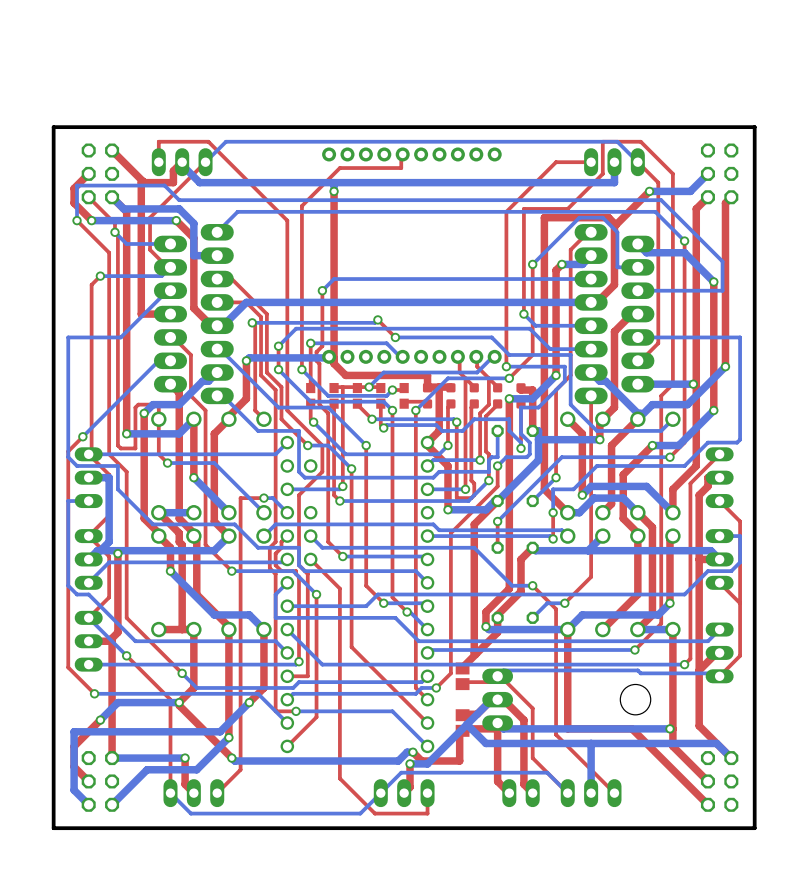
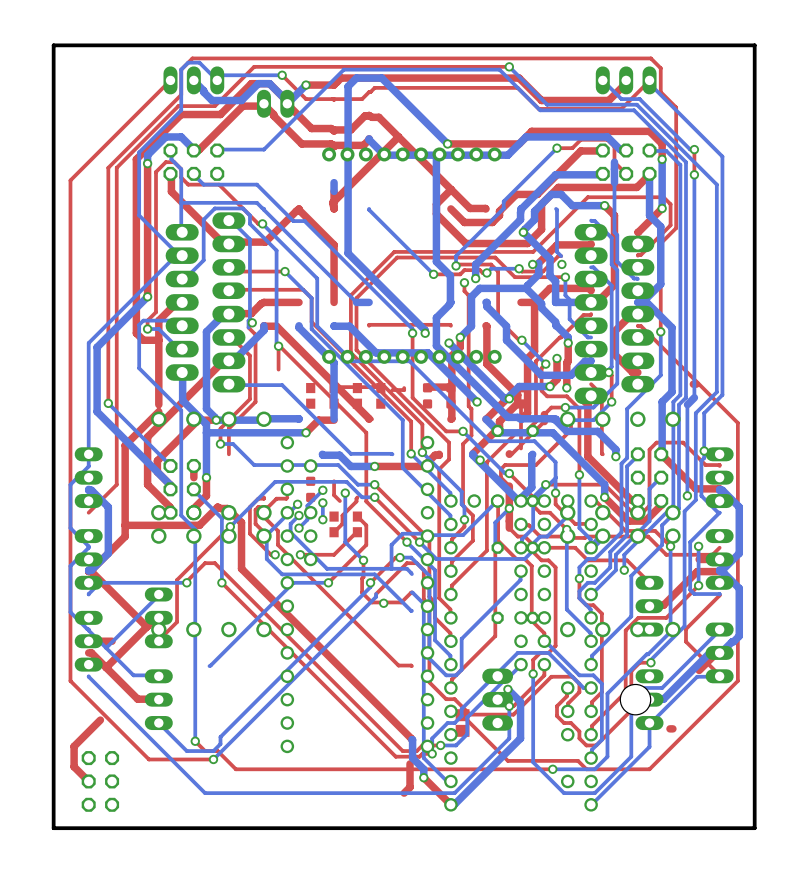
bottom track: none -> (509, 66) (547, 104) (636, 104) (716, 184) (716, 392) (695, 413) (695, 500) (684, 511) (684, 626) (650, 659) (650, 662)
top track: none -> (509, 66) (254, 66) (214, 106) (178, 106) (116, 167) (116, 484) (88, 512)
via: none -> (509, 66)
bottom track: none -> (282, 75) (221, 75) (217, 80) (199, 62) (188, 62) (181, 69) (181, 110) (139, 152) (139, 215) (178, 254) (182, 255) (177, 254) (88, 343) (88, 466) (70, 484) (70, 528) (88, 547) (70, 565) (70, 612) (133, 675) (158, 676)
top track: none -> (282, 75) (306, 99) (362, 99) (374, 87) (517, 87) (538, 108) (621, 108) (649, 80)
via: none -> (282, 75)
top track: none -> (170, 80) (70, 180) (70, 680) (148, 759) (213, 759)
bottom track: none -> (193, 80) (212, 100) (241, 100) (258, 83) (269, 83) (287, 103) (306, 85)
bottom track: none -> (602, 80) (621, 99) (639, 99) (690, 149) (694, 149)
top track: none -> (626, 80) (625, 83) (608, 100) (541, 100) (519, 78) (341, 78) (334, 85) (306, 85)
bottom track: none -> (649, 80) (649, 83) (722, 156) (722, 394) (704, 413) (704, 458) (701, 460) (701, 495) (719, 512) (690, 542) (690, 589) (694, 594) (719, 594)
via: none -> (306, 85)
part: none -> (275, 103)
board edge: (754, 127) (53, 127) -> (754, 127) (754, 45) (53, 45) (53, 127)
bottom track: none -> (369, 138) (384, 155) (507, 155) (526, 136) (607, 136) (620, 149) (626, 150)
top track: none -> (369, 138) (363, 145) (334, 146) (331, 143) (301, 143) (263, 103) (261, 106) (242, 106) (199, 149) (193, 150)
bottom track: none -> (447, 143) (381, 78) (356, 78) (348, 86) (348, 253) (425, 330) (425, 333)
top track: none -> (447, 143) (519, 143) (531, 131) (649, 131) (662, 143) (662, 159)
via: none -> (447, 143)
bottom track: none -> (557, 148) (503, 201) (503, 208) (456, 256) (456, 265)
top track: none -> (557, 148) (572, 148) (580, 139) (607, 139) (614, 146) (614, 162) (626, 173)
via: none -> (557, 148)
top track: none -> (694, 149) (694, 174)
via: none -> (694, 149)
top track: (112, 150) (144, 182) (173, 182) (173, 170) (182, 162) -> none
bottom track: none -> (170, 150) (171, 159) (181, 169) (182, 232)
bottom track: none -> (193, 150) (181, 136) (165, 136) (147, 155) (147, 163)
bottom track: none -> (217, 150) (263, 149) (343, 69) (499, 69) (540, 110) (634, 110) (685, 162) (685, 397) (678, 404) (678, 508) (662, 525) (662, 544) (631, 575) (631, 616) (592, 655) (591, 664)
top track: none -> (602, 150) (580, 150) (537, 194) (516, 194) (499, 211) (499, 215) (492, 222) (464, 222) (450, 208)
bottom track: none -> (649, 150) (666, 150) (680, 165) (680, 394) (673, 401) (673, 505) (624, 554) (624, 570)
top track: (402, 154) (401, 168) (339, 168) (301, 206) (301, 369) -> none
bottom track: none -> (662, 159) (662, 208)
via: none -> (662, 159)
top track: (158, 162) (158, 141) (208, 141) (287, 220) (287, 410) (322, 445) (322, 471) (299, 495) (299, 515) -> none
bottom track: (182, 162) (182, 165) (199, 182) (614, 182) -> (637, 279) (634, 278) (617, 261) (617, 235) (614, 232) (614, 182)
part position: (182, 162) -> (193, 80)
top track: (205, 162) (150, 217) (150, 249) (167, 267) (170, 267) -> none
top track: (591, 162) (556, 162) (506, 211) (506, 366) -> none
part position: (614, 162) -> (626, 80)
bottom track: (637, 162) (617, 141) (225, 141) (205, 162) -> none
top track: (637, 162) (658, 182) (658, 343) (640, 360) (637, 360) -> none
top track: none -> (147, 163) (147, 296)
via: none -> (147, 163)
top track: (88, 173) (74, 188) (74, 203) (91, 220) -> none
part rotation: 0° (100, 173) -> 90° clockwise (193, 162)
part position: (100, 173) -> (193, 162)
top track: none -> (170, 173) (171, 191) (223, 243) (265, 242) (299, 208) (334, 244)
bottom track: none -> (193, 173) (203, 184) (256, 184) (293, 221) (304, 221) (412, 329) (412, 333)
bottom track: none -> (602, 173) (555, 174) (521, 208) (520, 219) (475, 264) (475, 278)
bottom track: none -> (649, 173) (649, 215) (660, 226) (660, 284) (642, 302)
top track: none -> (649, 173) (636, 187) (558, 187) (541, 204) (541, 229) (527, 243) (465, 243) (436, 214) (436, 204) (451, 189)
bottom track: (707, 173) (690, 191) (649, 191) -> none
part rotation: 0° (719, 173) -> 90° clockwise (626, 162)
part position: (719, 173) -> (626, 162)
via: none -> (694, 174)
top track: (142, 181) (141, 314) (170, 314) -> none
via: (334, 191) -> none
top track: (649, 191) (614, 226) -> (604, 205) (614, 215) (614, 226)
via: (649, 191) -> none
top track: (88, 197) (114, 223) (114, 232) (117, 235) (117, 445) (120, 448) (135, 448) (135, 407) (138, 404) (158, 404) -> (182, 302) (177, 302) (158, 320) (158, 404)
bottom track: (112, 197) (123, 208) (179, 208) (193, 223) (193, 255) (217, 255) -> none
top track: (112, 197) (126, 211) (126, 433) -> none
top track: (707, 197) (696, 208) (696, 465) (672, 489) (672, 512) -> none
top track: (731, 197) (725, 203) (725, 366) -> none
bottom track: none -> (604, 205) (572, 205) (561, 194) (551, 194) (534, 211) (534, 219) (524, 229) (523, 232) (549, 258) (549, 275) (555, 281) (555, 302)
via: none -> (604, 205)
top track: (334, 208) (334, 244) -> (334, 208) (332, 202) (398, 136)
bottom track: none -> (369, 208) (433, 274)
top track: none -> (485, 208) (470, 208) (378, 117) (364, 115) (350, 129) (334, 131) (331, 128) (311, 128) (269, 83) (251, 83) (220, 114) (181, 114) (136, 159) (136, 333) (143, 340) (158, 340)
bottom track: none -> (556, 208) (557, 251) (561, 256)
top track: none -> (662, 208) (637, 232)
via: none -> (662, 208)
bottom track: (77, 220) (77, 185) (164, 185) (179, 200) (661, 200) (722, 261) (722, 290) (637, 290) -> none
top track: (77, 220) (109, 252) (109, 454) (126, 471) (126, 617) (182, 673) -> none
via: (77, 220) -> none
via: (91, 220) -> none
bottom track: (176, 220) (91, 220) -> none
top track: (176, 220) (193, 238) (193, 308) (211, 325) (217, 325) -> none
via: (176, 220) -> none
bottom track: none -> (228, 220) (231, 221) (249, 239) (248, 327)
bottom track: none -> (591, 220) (594, 221) (611, 237) (611, 264) (617, 270) (617, 383) (593, 407) (565, 407)
bottom track: none -> (262, 223) (317, 278) (317, 326) (352, 361) (409, 361) (489, 441) (534, 441) (555, 462) (555, 493)
top track: none -> (262, 223) (258, 223) (219, 184) (188, 184) (181, 177) (181, 169) (174, 162) (165, 162) (156, 172) (156, 312) (147, 320) (147, 329)
via: none -> (262, 223)
top track: (615, 224) (608, 217) (544, 217) (544, 414) -> (565, 407) (551, 407) (544, 414)
bottom track: (114, 232) (126, 243) (170, 243) -> none
via: (114, 232) -> none
bottom track: (217, 232) (237, 211) (655, 211) (684, 241) -> none
via: none -> (523, 232)
top track: (591, 232) (588, 232) (570, 249) (570, 375) (556, 390) (556, 477) -> none
top track: (684, 241) (684, 442) (669, 457) -> none
via: (684, 241) -> none
top track: none -> (591, 243) (557, 244) (538, 263)
bottom track: (637, 243) (646, 252) (684, 252) (713, 281) -> none
bottom track: (591, 255) (582, 264) (561, 264) -> none
top track: none -> (637, 255) (641, 254) (670, 225) (670, 204) (663, 197) (587, 197) (533, 251) (394, 251) (350, 295) (350, 352) (422, 424) (422, 452)
top track: none -> (561, 256) (558, 256) (542, 271) (521, 271) (519, 268)
bottom track: none -> (538, 263) (538, 274) (526, 288)
bottom track: (532, 264) (579, 217) (602, 217) (617, 232) (617, 267) (637, 267) -> none
top track: (532, 264) (532, 354) (509, 378) -> none
top track: (561, 264) (556, 270) (556, 375) -> none
top track: none -> (456, 265) (491, 264) (498, 271) (498, 319) (519, 340) (521, 340)
via: none -> (456, 265)
bottom track: (170, 267) (161, 276) (100, 276) -> none
top track: none -> (228, 267) (233, 271) (284, 271)
bottom track: none -> (591, 267) (593, 267) (611, 285) (611, 366) (608, 372)
bottom track: none -> (519, 268) (491, 268) (486, 272)
via: none -> (519, 268)
bottom track: none -> (284, 271) (311, 298) (311, 329) (402, 420) (402, 467) (450, 515) (450, 524)
via: none -> (284, 271)
top track: none -> (486, 272) (482, 272) (479, 270) (464, 270) (460, 274) (433, 274)
via: none -> (486, 272)
via: none -> (433, 274)
top track: (100, 276) (91, 284) (91, 457) -> none
via: (100, 276) -> none
bottom track: none -> (565, 277) (565, 295) (569, 299) (569, 319) (587, 337) (591, 337)
top track: none -> (565, 277) (514, 277) (495, 257) (397, 257) (356, 298) (356, 350) (449, 442) (449, 459) (439, 469) (439, 598) (450, 609) (450, 617)
via: none -> (565, 277)
via: none -> (475, 278)
bottom track: none -> (182, 279) (185, 278) (203, 260) (203, 219) (214, 208) (242, 208) (249, 215) (249, 223) (276, 250) (276, 343)
top track: (217, 279) (231, 279) (266, 314) (266, 372) (281, 387) (281, 419) (307, 445) -> none
bottom track: (591, 279) (334, 279) (322, 290) -> none
top track: (713, 281) (713, 410) -> none
via: (713, 281) -> none
top track: none -> (464, 282) (464, 291) (468, 295) (468, 406) (471, 408) (471, 435) (463, 444) (463, 505) (472, 515) (472, 540) (451, 561) (450, 571)
via: none -> (464, 282)
bottom track: none -> (526, 288) (479, 288) (471, 296) (471, 326) (460, 337)
bottom track: none -> (526, 288) (541, 303) (541, 308) (568, 337) (568, 343)
bottom track: (170, 290) (167, 290) (120, 337) (68, 337) (68, 457) (77, 465) (117, 465) (117, 489) (152, 524) (234, 524) (258, 547) (299, 547) (299, 565) (304, 571) (415, 571) (427, 582) -> none
top track: none -> (228, 290) (303, 289) (311, 298) (311, 322) (411, 421) (411, 453)
top track: (322, 290) (322, 346) (316, 352) (316, 360) (319, 363) (319, 404) (328, 413) (328, 541) (342, 556) -> none
via: (322, 290) -> none
top track: none -> (591, 290) (589, 288) (549, 288) (535, 302) (521, 302)
bottom track: none -> (147, 296) (97, 347) (97, 411) (170, 484) (170, 489)
via: none -> (147, 296)
top track: (217, 302) (246, 302) (261, 317) (261, 375) (275, 390) (275, 541) (269, 547) (269, 568) (275, 574) (275, 711) (296, 711) -> none
top track: none -> (299, 302) (263, 302) (251, 313) (228, 314)
top track: (334, 302) (334, 357) (329, 356) (345, 375) (427, 375) (427, 387) -> none
bottom track: (356, 302) (246, 302) (223, 325) (217, 325) -> (356, 302) (256, 202) (181, 202)
bottom track: (450, 302) (369, 302) -> (450, 302) (450, 275) (436, 261) (436, 155)
bottom track: (485, 302) (450, 302) -> (615, 456) (615, 449) (597, 431) (566, 431) (556, 419) (507, 417) (436, 345) (436, 317) (450, 302)
top track: none -> (534, 302) (534, 351) (527, 358) (527, 413) (521, 419)
bottom track: (555, 302) (486, 302) -> (591, 360) (585, 361) (571, 375) (541, 375) (506, 340) (506, 326) (486, 306) (486, 302)
bottom track: none -> (637, 302) (646, 302) (671, 327) (671, 392) (662, 401) (661, 454)
part position: (193, 314) -> (205, 302)
bottom track: none -> (228, 314) (223, 315) (206, 331) (206, 408) (216, 420) (299, 419)
bottom track: (523, 314) (535, 325) (591, 325) -> none
top track: (523, 314) (523, 208) (567, 208) (602, 173) (602, 141) (640, 141) (672, 173) (672, 384) (661, 395) (661, 623) (634, 650) -> none
via: (523, 314) -> none
top track: none -> (591, 314) (583, 315) (535, 361) (535, 421) (526, 431) (517, 431) (486, 462) (486, 550) (451, 585) (450, 594)
bottom track: (377, 319) (374, 322) (252, 322) -> none
top track: (377, 319) (395, 337) -> none
via: (377, 319) -> none
top track: (252, 322) (255, 325) (255, 410) (263, 419) -> none
bottom track: none -> (182, 325) (177, 320) (143, 320) (139, 324) (139, 368) (181, 410) (181, 515) (195, 529) (195, 741)
bottom track: none -> (263, 325) (263, 330) (234, 359) (228, 360)
top track: none -> (263, 325) (276, 326) (369, 419)
bottom track: none -> (299, 325) (334, 362) (334, 419)
bottom track: none -> (334, 325) (349, 326) (376, 352) (428, 352) (477, 401)
top track: none -> (450, 325) (369, 325)
top track: none -> (485, 325) (486, 364) (517, 394) (517, 403) (499, 421) (499, 427) (472, 453)
top track: none -> (637, 325) (641, 326) (737, 422) (737, 680) (649, 769) (586, 769) (578, 760) (507, 760) (458, 711) (450, 711)
top track: none -> (248, 327) (255, 334) (255, 401) (228, 428) (228, 454)
bottom track: none -> (147, 329) (158, 329) (178, 348) (182, 349)
via: none -> (147, 329)
bottom track: none -> (660, 331) (660, 375) (627, 408) (627, 458) (621, 463) (621, 532) (594, 558) (587, 558) (579, 567) (579, 578)
top track: none -> (660, 331) (660, 243) (676, 228) (676, 107) (660, 92) (660, 68) (650, 58) (192, 58) (181, 69) (181, 94) (108, 167) (108, 403)
via: none -> (660, 331)
top track: none -> (412, 333) (412, 397) (446, 431) (463, 431)
via: none -> (412, 333)
via: none -> (425, 333)
top track: (170, 337) (173, 337) (190, 354) (190, 395) (205, 410) (205, 544) (231, 571) -> none
top track: none -> (228, 337) (231, 337) (249, 355) (249, 399) (220, 428) (220, 444)
bottom track: (395, 337) (491, 337) (509, 354) (570, 354) (570, 404) (596, 430) (661, 430) (672, 419) -> none
via: (395, 337) -> none
top track: none -> (460, 337) (460, 347) (451, 355) (450, 419)
via: none -> (460, 337)
bottom track: (637, 337) (740, 337) (740, 439) (737, 442) (707, 442) (684, 465) (596, 465) (573, 489) (553, 489) (553, 512) -> none
bottom track: none -> (521, 340) (545, 364)
via: none -> (521, 340)
top track: none -> (276, 343) (366, 432) (366, 501) (406, 542)
bottom track: (310, 343) (386, 343) (402, 356) -> none
top track: (310, 343) (310, 388) -> none
via: (310, 343) -> none
bottom track: none -> (449, 343) (506, 399) (519, 386) (549, 386)
via: none -> (449, 343)
top track: none -> (568, 343) (566, 387)
via: none -> (568, 343)
bottom track: (278, 346) (296, 328) (529, 328) (550, 349) (591, 349) -> none
bottom track: (217, 349) (220, 349) (278, 407) (328, 407) (366, 445) -> none
top track: (614, 354) (614, 407) (599, 425) (599, 439) -> (614, 354) (632, 372) (637, 372)
bottom track: (329, 356) (249, 357) (246, 360) -> none
top track: (457, 356) (459, 357) (459, 372) (474, 387) -> none
top track: (476, 356) (477, 366) (497, 387) -> none
bottom track: (494, 356) (477, 372) (383, 372) (369, 387) -> none
top track: none -> (557, 358) (557, 379) (549, 386)
via: none -> (557, 358)
bottom track: (170, 360) (158, 360) (82, 436) -> none
top track: none -> (228, 360) (223, 361) (147, 437) (147, 484) (170, 507) (170, 512)
top track: (246, 360) (246, 398) (214, 433) (214, 521) (228, 536) -> none
via: (246, 360) -> none
top track: none -> (545, 364) (541, 368) (541, 390) (547, 396) (566, 396) (579, 408) (579, 474)
via: none -> (545, 364)
bottom track: (506, 366) (564, 366) (564, 381) (538, 407) (521, 407) (521, 433) (529, 442) (529, 454) (526, 457) (506, 457) (497, 465) -> none
via: (506, 366) -> none
bottom track: (725, 366) (694, 397) -> (694, 174) (694, 397)
via: (725, 366) -> none
bottom track: (278, 369) (310, 401) (383, 401) (392, 410) -> none
via: (278, 369) -> none
bottom track: (301, 369) (328, 395) (386, 395) (392, 390) -> none
via: (301, 369) -> none
bottom track: none -> (182, 372) (182, 400) (206, 424) (206, 477)
bottom track: (217, 372) (208, 381) (202, 381) (179, 404) (152, 404) (144, 413) -> none
bottom track: (591, 372) (599, 381) (605, 381) (637, 413) (640, 413) (637, 419) (652, 404) (687, 404) -> (687, 495) (687, 404)
top track: none -> (608, 372) (611, 375) (611, 401)
via: none -> (608, 372)
bottom track: (556, 375) (532, 398) (509, 398) -> none
via: (556, 375) -> none
top track: (465, 378) (465, 489) -> none
top track: (488, 378) (488, 404) (480, 413) (480, 460) -> none
bottom track: (509, 378) (447, 378) (415, 410) -> none
via: (509, 378) -> none
top track: (170, 384) (179, 392) (179, 518) (193, 533) (196, 539) (196, 594) (228, 626) (228, 737) -> none
bottom track: none -> (228, 384) (282, 385) (350, 453) (392, 454)
top track: none -> (591, 384) (601, 394) (602, 454)
bottom track: (693, 384) (637, 384) -> none
via: (693, 384) -> none
via: none -> (549, 386)
top track: (342, 387) (342, 486) -> none
via: (369, 387) -> none
top track: (439, 387) (439, 430) (427, 442) (427, 445) (447, 465) (447, 509) -> none
top track: (521, 387) (521, 390) (532, 390) (532, 430) -> none
via: none -> (566, 387)
via: (392, 390) -> none
bottom track: (217, 395) (223, 395) (258, 430) (299, 430) (299, 471) (304, 477) (433, 477) (439, 471) (488, 471) (488, 460) (491, 457) (497, 457) (497, 430) -> none
part: (404, 395) -> none
part: (474, 395) -> none
part: (497, 395) -> none
top track: (591, 395) (591, 576) (564, 603) -> none
top track: (509, 398) (509, 453) -> none
top track: none -> (506, 399) (485, 419)
top track: none -> (582, 399) (587, 404) (587, 456) (631, 500) (637, 501)
via: none -> (477, 401)
bottom track: none -> (611, 401) (593, 420) (571, 420)
via: none -> (611, 401)
bottom track: none -> (108, 403) (170, 465)
via: none -> (108, 403)
top track: (310, 403) (310, 419) (313, 422) -> none
top track: (380, 403) (380, 425) (383, 428) -> none
top track: (404, 403) (404, 401) (427, 401) (427, 403) -> none
top track: (450, 403) (447, 407) (447, 445) -> none
top track: (474, 403) (471, 407) (471, 480) (474, 483) (474, 495) (471, 498) (456, 498) (456, 422) -> none
top track: (497, 403) (485, 416) (485, 451) (488, 454) (488, 480) -> none
via: none -> (565, 407)
top track: (392, 410) (392, 597) (407, 612) -> none
via: (392, 410) -> none
top track: (415, 410) (415, 687) (427, 699) -> none
via: (415, 410) -> none
bottom track: (713, 410) (678, 445) (652, 445) -> none
via: (713, 410) -> none
top track: (158, 411) (158, 454) (167, 463) -> (158, 411) (125, 445) (125, 536) (88, 571) (91, 571) (146, 626)
top track: (144, 413) (144, 518) (170, 547) (170, 571) -> none
via: (144, 413) -> none
bottom track: (193, 419) (179, 433) (126, 433) -> none
top track: (193, 419) (193, 465) -> none
bottom track: (372, 419) (453, 419) (456, 422) -> none
via: (372, 419) -> none
bottom track: none -> (485, 419) (499, 432) (552, 432) (604, 484) (604, 497)
top track: (567, 419) (582, 433) (582, 495) -> none
top track: (637, 419) (611, 445) (611, 503) (602, 512) -> none
top track: none -> (216, 420) (198, 420) (157, 460) (157, 472) (170, 484) (170, 489)
via: none -> (216, 420)
top track: (334, 420) (334, 481) -> (334, 420) (318, 420) (306, 432)
top track: (544, 421) (544, 489) (567, 512) -> (544, 421) (512, 453) (509, 454)
bottom track: (313, 422) (345, 454) (439, 454) (447, 445) -> none
via: (313, 422) -> none
via: (456, 422) -> none
bottom track: (383, 428) (386, 425) (436, 425) (442, 430) (462, 430) (474, 419) (509, 419) (509, 430) (521, 442) (521, 448) -> none
via: (383, 428) -> none
bottom track: (532, 430) (538, 430) (538, 460) (497, 501) (494, 501) (485, 509) (447, 509) -> none
bottom track: none -> (463, 431) (505, 473) (509, 473)
via: none -> (463, 431)
bottom track: none -> (306, 432) (206, 432)
via: none -> (306, 432)
via: (126, 433) -> none
top track: (82, 436) (68, 451) (68, 667) (94, 693) -> none
via: (82, 436) -> none
bottom track: (599, 439) (538, 439) -> none
via: (599, 439) -> none
bottom track: (287, 442) (275, 454) (88, 454) -> none
bottom track: none -> (220, 444) (233, 444) (254, 465) (338, 465) (357, 484) (374, 484)
via: none -> (220, 444)
bottom track: (307, 445) (328, 445) (351, 468) -> none
via: (307, 445) -> none
top track: (366, 445) (366, 585) (383, 603) -> none
via: (366, 445) -> none
via: (447, 445) -> none
top track: (652, 445) (623, 474) (623, 518) (637, 533) (637, 594) (602, 629) -> none
via: (652, 445) -> none
via: (521, 448) -> none
via: none -> (704, 451)
bottom track: none -> (422, 452) (461, 491) (464, 519)
via: none -> (422, 452)
bottom track: none -> (411, 453) (450, 493) (450, 501)
via: none -> (411, 453)
bottom track: none -> (472, 453) (517, 500) (521, 501) (521, 497) (531, 487) (532, 454)
top track: (88, 454) (109, 474) (109, 515) (88, 536) (109, 556) (109, 597) (88, 617) -> none
bottom track: none -> (322, 454) (339, 455) (350, 466) (374, 466)
top track: none -> (439, 454) (435, 455) (423, 466) (374, 466)
top track: (509, 454) (509, 486) -> (571, 420) (571, 429) (535, 465) (505, 465) (500, 469) (500, 477) (509, 486)
bottom track: none -> (637, 454) (627, 466) (627, 535) (610, 551) (610, 567) (594, 582) (587, 582) (579, 591) (579, 598) (590, 609) (591, 617)
top track: none -> (661, 454) (695, 488) (719, 489)
top track: (719, 454) (690, 483) (690, 658) (684, 664) -> none
via: none -> (615, 456)
bottom track: (669, 457) (561, 457) (497, 521) -> none
via: (669, 457) -> none
bottom track: (480, 460) (433, 460) (427, 465) -> none
bottom track: (167, 463) (214, 463) (263, 512) -> none
via: (167, 463) -> none
top track: (497, 465) (497, 486) (450, 533) (450, 673) (436, 687) -> none
via: (497, 465) -> none
top track: none -> (719, 465) (705, 465) (683, 442) (656, 442) (649, 449) (649, 505) (642, 512) (632, 512) (604, 484) (545, 484)
via: none -> (374, 466)
top track: (351, 468) (351, 647) (427, 723) -> none
via: (351, 468) -> none
top track: none -> (509, 473) (531, 495) (531, 504) (540, 512) (549, 512) (566, 529)
via: none -> (509, 473)
bottom track: none -> (579, 474) (579, 528) (590, 539) (591, 547)
via: none -> (579, 474)
bottom track: (88, 477) (109, 477) (109, 541) (100, 550) -> none
bottom track: (193, 477) (228, 512) -> none
via position: (193, 477) -> (206, 477)
top track: none -> (206, 477) (206, 495) (193, 508) (193, 512)
via: (556, 477) -> none
part: none -> (649, 477)
bottom track: none -> (661, 477) (649, 488) (649, 521) (615, 554) (615, 570) (591, 594)
top track: (719, 477) (707, 477) (707, 486) (699, 495) (699, 725) (731, 758) -> none
bottom track: (488, 480) (468, 501) (339, 501) -> none
via: (488, 480) -> none
top track: none -> (374, 484) (429, 539) (429, 596) (435, 602) (435, 617) (450, 633) (450, 641)
via: none -> (374, 484)
bottom track: none -> (545, 484) (533, 497) (533, 528) (521, 539) (521, 547)
via: none -> (545, 484)
bottom track: (342, 486) (339, 489) (287, 489) -> none
via: (342, 486) -> none
bottom track: none -> (88, 489) (108, 507) (108, 553) (88, 571)
part: none -> (182, 489)
bottom track: none -> (193, 489) (221, 518) (221, 582)
part: none -> (310, 489)
bottom track: (465, 489) (427, 489) -> none
via: (465, 489) -> none
bottom track: none -> (719, 489) (739, 507) (739, 553) (722, 570) (719, 570) (739, 588) (739, 636) (722, 651) (709, 652) (663, 699) (649, 699)
bottom track: none -> (322, 490) (307, 505) (307, 519) (299, 528)
via: none -> (322, 490)
bottom track: none -> (345, 493) (345, 542) (363, 560)
via: none -> (345, 493)
top track: none -> (555, 493) (555, 504) (575, 523) (591, 524)
via: none -> (555, 493)
bottom track: (582, 495) (591, 486) (646, 486) (672, 512) -> none
via: (582, 495) -> none
via: none -> (687, 495)
top track: none -> (263, 497) (258, 498) (249, 507) (249, 533) (270, 554) (275, 554)
top track: none -> (287, 497) (276, 498) (268, 507) (258, 507) (255, 509) (255, 523) (263, 532)
top track: none -> (357, 497) (356, 501) (342, 515) (342, 523) (334, 532)
bottom track: none -> (374, 497) (362, 497) (346, 481) (275, 481) (230, 526)
top track: none -> (374, 497) (419, 542)
via: none -> (374, 497)
top track: none -> (604, 497) (628, 521) (645, 521) (660, 505) (661, 501)
via: none -> (604, 497)
bottom track: (263, 498) (272, 498) (287, 512) -> none
top track: (263, 498) (240, 498) (240, 769) (217, 793) -> none
via: (263, 498) -> none
bottom track: (88, 501) (68, 501) (68, 585) (77, 594) (88, 594) (135, 641) (275, 641) (287, 652) -> none
via: (339, 501) -> none
bottom track: none -> (497, 501) (463, 535) (402, 533) (391, 544) (391, 568)
top track: (497, 501) (474, 524) (475, 654) -> (497, 501) (498, 540) (516, 558) (524, 558) (531, 565) (531, 620) (544, 633) (544, 641)
bottom track: none -> (567, 501) (566, 516) (547, 536) (540, 536) (531, 544) (531, 551) (524, 558) (436, 558) (419, 542)
top track: none -> (591, 501) (596, 501) (625, 530) (655, 530) (670, 546)
top track: (719, 501) (740, 521) (740, 655) (719, 676) -> (719, 594) (685, 629) (685, 641) (719, 676)
bottom track: none -> (322, 502) (322, 519)
via: none -> (322, 502)
bottom track: none -> (297, 504) (266, 535) (266, 558) (282, 574) (374, 574) (411, 610)
via: none -> (297, 504)
bottom track: none -> (509, 508) (495, 522) (495, 550)
via: none -> (509, 508)
via: (447, 509) -> none
top track: (158, 512) (179, 533) (179, 541) (182, 544) (182, 629) -> none
bottom track: (193, 512) (158, 512) -> none
top track: (553, 512) (553, 539) -> none
via: (553, 512) -> none
bottom track: (637, 512) (623, 498) (594, 498) (579, 512) (567, 512) -> none
top track: (637, 512) (652, 527) (652, 614) (637, 629) -> none
bottom track: none -> (299, 515) (290, 523) (290, 532) (327, 568) (406, 568) (411, 574)
via: none -> (299, 515)
top track: none -> (263, 516) (277, 530) (277, 544) (398, 665) (411, 666)
top track: (299, 516) (299, 565) (307, 574) (307, 676) (287, 676) -> none
top track: none -> (357, 516) (366, 525) (366, 544) (328, 582)
via: none -> (322, 519)
top track: none -> (464, 519) (464, 526) (451, 539) (450, 547)
via: none -> (464, 519)
via: (497, 521) -> none
part: none -> (334, 524)
part: none -> (357, 524)
top track: none -> (521, 524) (528, 525) (540, 536) (648, 536) (666, 554) (712, 554) (719, 547)
top track: none -> (125, 525) (199, 525) (217, 507) (227, 508) (241, 522) (241, 568) (411, 739)
top track: none -> (230, 526) (177, 580) (177, 622) (158, 641)
via: none -> (230, 526)
via: none -> (299, 528)
top track: (509, 528) (509, 588) (485, 612) (485, 626) -> (509, 528) (517, 536) (524, 536) (533, 544) (533, 551) (541, 560) (548, 560) (555, 567) (555, 645) (548, 652) (540, 652) (533, 659) (533, 673)
bottom track: none -> (566, 529) (566, 609) (590, 633) (591, 641)
via: none -> (566, 529)
top track: none -> (357, 532) (334, 554) (300, 554)
bottom track: (228, 536) (214, 550) (97, 550) (88, 559) -> none
top track: (287, 536) (281, 541) (281, 547) (275, 553) (275, 565) (281, 571) (296, 571) (299, 576) (299, 661) -> none
bottom track: (310, 536) (322, 547) (474, 547) (512, 585) (532, 585) -> none
bottom track: (427, 536) (550, 536) (553, 539) -> none
bottom track: (567, 536) (561, 530) (439, 530) (433, 524) (275, 524) (263, 536) -> none
top track: (672, 536) (669, 539) (669, 603) -> none
bottom track: (719, 536) (740, 536) (740, 562) (731, 571) (707, 571) (684, 594) (377, 594) (366, 606) (287, 606) -> none
via: (553, 539) -> none
bottom track: none -> (406, 542) (435, 570) (435, 640) (450, 655) (450, 664)
via: none -> (406, 542)
via: none -> (419, 542)
bottom track: none -> (670, 546) (670, 631) (607, 693) (607, 756) (594, 769) (552, 769)
via: none -> (670, 546)
bottom track: none -> (698, 546) (698, 585)
via: none -> (698, 546)
bottom track: (532, 547) (535, 550) (710, 550) (719, 559) -> none
top track: (532, 547) (521, 559) (521, 591) (497, 614) (497, 632) (462, 668) -> none
top track: none -> (544, 547) (575, 547) (587, 560) (627, 560) (649, 582)
top track: none -> (495, 550) (495, 636) (451, 679) (450, 687)
top track: (117, 553) (117, 632) (112, 638) (112, 758) -> none
via: (117, 553) -> none
via: none -> (275, 554)
via: none -> (300, 554)
bottom track: (342, 556) (424, 556) (427, 559) -> none
via: (342, 556) -> none
bottom track: none -> (399, 557) (411, 557) (429, 575) (429, 658) (446, 675) (456, 675) (461, 669) (461, 638) (520, 580) (521, 571)
top track: none -> (399, 557) (395, 557) (370, 582)
via: none -> (399, 557)
bottom track: (287, 559) (284, 562) (109, 562) (88, 582) -> none
top track: (310, 559) (339, 588) (339, 778) (374, 813) (427, 813) (427, 793) -> none
top track: none -> (363, 560) (362, 592) (371, 602) (401, 602) (411, 592)
via: none -> (363, 560)
via: none -> (624, 570)
bottom track: (170, 571) (214, 614) (249, 614) (263, 629) -> none
via position: (170, 571) -> (186, 582)
bottom track: (231, 571) (293, 571) (316, 594) -> none
via position: (231, 571) -> (221, 582)
top track: none -> (719, 571) (697, 571) (663, 605) (649, 606)
top track: none -> (579, 578) (579, 598) (586, 605) (593, 605) (601, 613) (601, 692) (592, 701) (591, 711)
via: none -> (579, 578)
bottom track: none -> (186, 582) (99, 582) (88, 594)
top track: none -> (186, 582) (205, 563) (214, 563) (402, 751) (416, 751) (422, 745) (440, 745)
top track: none -> (221, 582) (395, 756) (419, 756) (422, 753) (432, 753)
bottom track: (287, 582) (275, 594) (275, 617) (395, 617) (418, 641) (707, 641) (719, 629) -> (533, 673) (533, 762) (564, 793) (594, 793) (631, 756) (631, 694) (638, 687) (662, 687) (719, 629)
bottom track: none -> (328, 582) (293, 582) (209, 666)
via: none -> (328, 582)
bottom track: none -> (370, 582) (370, 587) (220, 737) (220, 744) (213, 751) (186, 751) (158, 723)
via: none -> (370, 582)
top track: (719, 582) (740, 603) -> none
top track: (532, 585) (556, 609) (556, 734) (614, 793) -> none
via: (532, 585) -> none
top track: none -> (698, 585) (666, 617) (638, 617) (625, 630) (625, 692) (592, 725) (591, 734)
via: none -> (698, 585)
bottom track: none -> (411, 592) (423, 603) (423, 758) (446, 780) (450, 781)
bottom track: none -> (158, 594) (106, 648)
top track: (316, 594) (316, 717) (287, 746) -> none
via: (316, 594) -> none
bottom track: none -> (376, 594) (376, 596) (213, 759)
top track: none -> (376, 594) (406, 563) (416, 563) (423, 570) (423, 599) (429, 605) (429, 682) (446, 699) (454, 699) (470, 714) (513, 714) (551, 676) (572, 676) (579, 683) (579, 692) (568, 703) (567, 711)
bottom track: (383, 603) (424, 603) (427, 606) -> none
bottom track: (564, 603) (547, 603) (532, 617) -> none
via: (564, 603) -> none
bottom track: (669, 603) (658, 614) (582, 614) (567, 629) (488, 629) (485, 626) -> none
via: (669, 603) -> none
part: none -> (649, 606)
bottom track: (407, 612) (410, 612) (427, 629) -> none
via: (407, 612) -> none
bottom track: (88, 617) (126, 655) -> none
top track: none -> (158, 617) (156, 617) (106, 667)
part: none -> (158, 617)
via: (485, 626) -> none
top track: (158, 629) (193, 629) (193, 687) (179, 702) (179, 705) (231, 758) -> none
top track: (263, 629) (263, 687) (249, 702) -> none
bottom track: (287, 629) (322, 664) (684, 664) -> none
top track: (567, 629) (567, 728) (632, 728) (707, 804) -> none
bottom track: (672, 629) (637, 629) -> none
top track: (672, 629) (672, 746) (707, 781) -> none
bottom track: none -> (544, 641) (579, 675) (593, 675) (601, 683) (601, 739) (592, 749) (591, 758)
bottom track: (634, 650) (430, 650) (427, 652) -> none
via: (634, 650) -> none
top track: none -> (88, 652) (91, 652) (137, 699) (158, 699)
part: none -> (521, 652)
top track: (126, 655) (170, 699) (170, 793) -> none
via: (126, 655) -> none
bottom track: (299, 661) (296, 664) (88, 664) -> none
via: (299, 661) -> none
top track: none -> (650, 662) (639, 662) (631, 671) (631, 710) (596, 745) (586, 745) (579, 738) (579, 731) (571, 723) (564, 723) (557, 716) (557, 706) (566, 696) (567, 687)
via: none -> (650, 662)
bottom track: none -> (521, 664) (467, 717) (467, 734) (456, 745) (440, 745)
top track: none -> (544, 664) (544, 675) (513, 706) (509, 706)
via: (684, 664) -> none
bottom track: (182, 673) (196, 687) (293, 687) (299, 682) (421, 682) (427, 676) -> none
via: (182, 673) -> none
via: none -> (533, 673)
bottom track: none -> (88, 676) (205, 793) (454, 793) (509, 738) (509, 706)
part: (462, 676) -> none
bottom track: (719, 676) (716, 673) (640, 673) (637, 670) (503, 670) (497, 676) -> (719, 676) (697, 676) (649, 723) (649, 746) (591, 804)
top track: (462, 684) (462, 682) (506, 682) (532, 708) (532, 758) (567, 793) -> none
bottom track: (436, 687) (421, 687) (415, 693) (293, 693) (287, 699) -> none
via: (436, 687) -> none
bottom track: none -> (591, 687) (583, 687) (548, 652) (517, 652) (461, 709) (461, 716) (454, 723) (447, 723) (432, 738) (432, 753)
bottom track: none -> (507, 689) (520, 701) (520, 738) (454, 804) (450, 804)
via: none -> (507, 689)
bottom track: (94, 693) (258, 693) (287, 723) -> none
via: (94, 693) -> none
part: none -> (158, 699)
bottom track: (497, 699) (491, 699) (427, 763) (410, 763) -> none
part: none -> (649, 699)
bottom track: (179, 702) (117, 702) (100, 720) -> none
via: (179, 702) -> none
bottom track: (249, 702) (220, 731) (74, 731) (74, 790) (88, 804) -> none
via: (249, 702) -> none
via: none -> (509, 706)
bottom track: (296, 711) (392, 711) (427, 746) -> none
via: (296, 711) -> none
top track: (462, 715) (477, 714) (491, 699) (503, 699) (523, 720) (523, 784) (532, 793) -> none
via: (100, 720) -> none
bottom track: (497, 723) (503, 728) (669, 728) -> none
top track: (497, 723) (497, 781) (509, 793) -> none
bottom track: (466, 724) (485, 743) (716, 743) (731, 758) -> none
top track: (497, 728) (462, 728) (459, 731) (459, 761) (421, 761) (412, 752) -> none
via: (669, 728) -> none
bottom track: (228, 737) (196, 769) (147, 769) (112, 804) -> none
via: (228, 737) -> none
bottom track: none -> (411, 739) (412, 758) (423, 769) (423, 777)
top track: none -> (195, 741) (205, 751) (217, 751) (235, 769) (552, 769)
via: none -> (195, 741)
bottom track: (591, 743) (591, 793) -> none
via: none -> (440, 745)
bottom track: (412, 752) (407, 752) (398, 761) (234, 761) (231, 758) -> none
via: (412, 752) -> none
via: none -> (432, 753)
bottom track: (185, 758) (112, 758) -> none
top track: (185, 758) (185, 784) (193, 793) -> none
via: (185, 758) -> none
via: (231, 758) -> none
via: none -> (213, 759)
via: (410, 763) -> none
via: none -> (552, 769)
top track: none -> (423, 777) (450, 804)
via: none -> (423, 777)
part: (719, 781) -> none
part: (193, 793) -> none
part: (404, 793) -> none
part: (521, 793) -> none
bottom track: (567, 793) (547, 772) (401, 772) (360, 813) (190, 813) (170, 793) -> none
part: (591, 793) -> none

